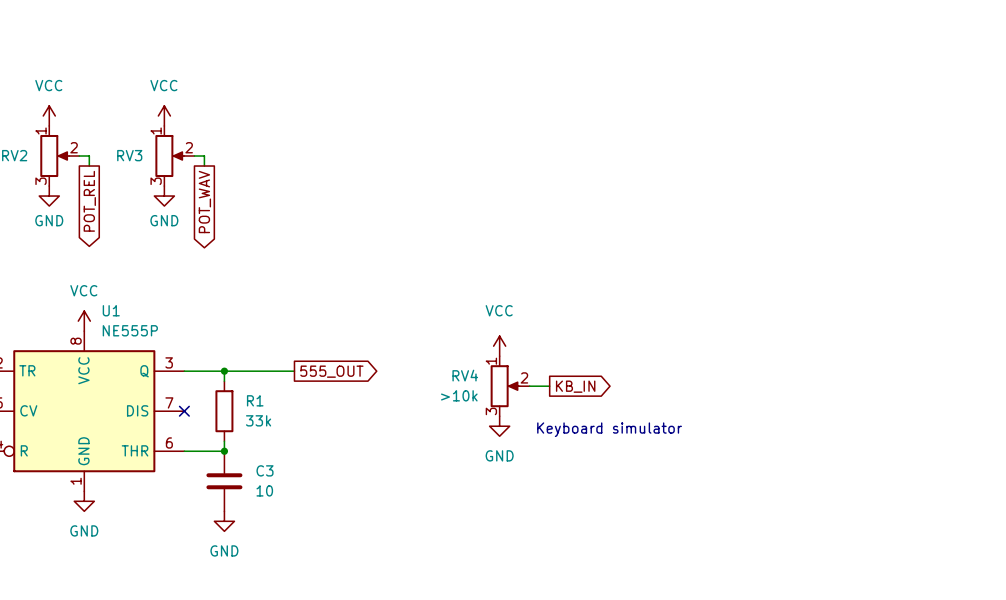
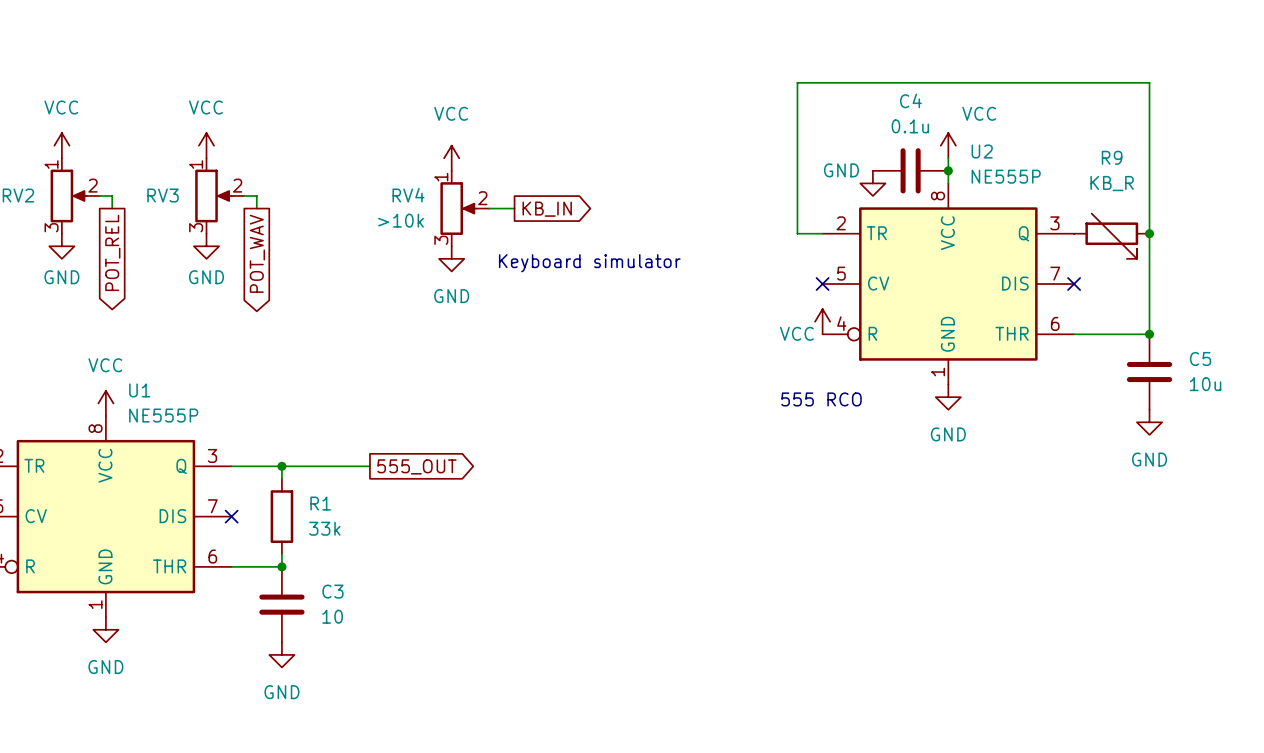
power symbol: none -> VCC (948, 145)
power symbol: none -> VCC (451, 158)
wire: none -> (948, 158) (948, 183)
C4: none -> 0.1u (910, 170)
junction: none -> (948, 170)
power symbol: none -> GND (872, 183)
wire: none -> (489, 208) (514, 208)
global label: none -> KB_IN (547, 209)
wire: none -> (822, 233) (797, 233) (797, 82) (1149, 82) (1149, 334) (1074, 334)
junction: none -> (1149, 233)
R9: none -> KB_R (1111, 236)
power symbol: none -> GND (451, 258)
text: none -> Keyboard simulator (589, 263)
no-connect mark: none -> (822, 284)
U2: none -> NE555P (948, 284)
no-connect mark: none -> (1074, 284)
power symbol: none -> VCC (822, 321)
junction: none -> (1149, 334)
C5: none -> 10u (1149, 372)
power symbol: none -> GND (948, 397)
text: none -> 555 RCO (821, 399)
power symbol: none -> GND (1149, 422)
power symbol: VCC (499, 346) -> none
RV4 position: (510, 386) -> (464, 208)
wire: (529, 386) (549, 386) -> none
global label: KB_IN (575, 386) -> none
power symbol: GND (499, 426) -> none
text: Keyboard simulator (609, 429) -> none

